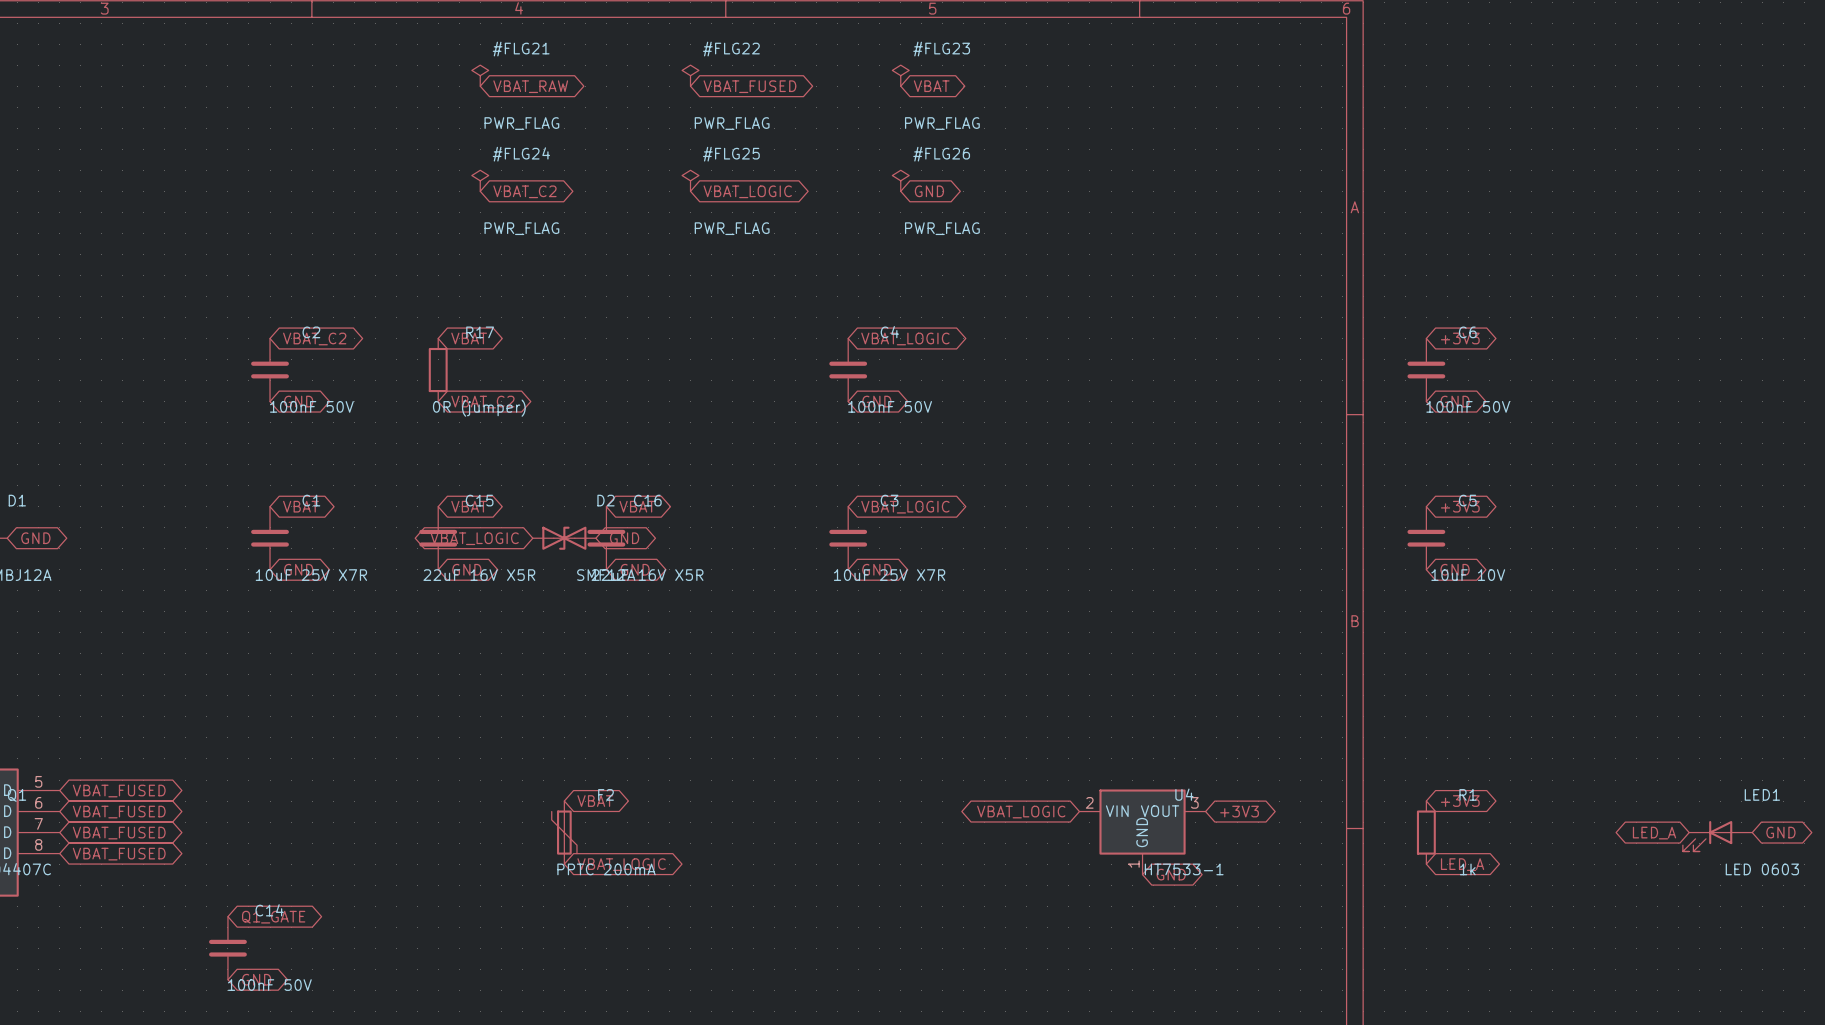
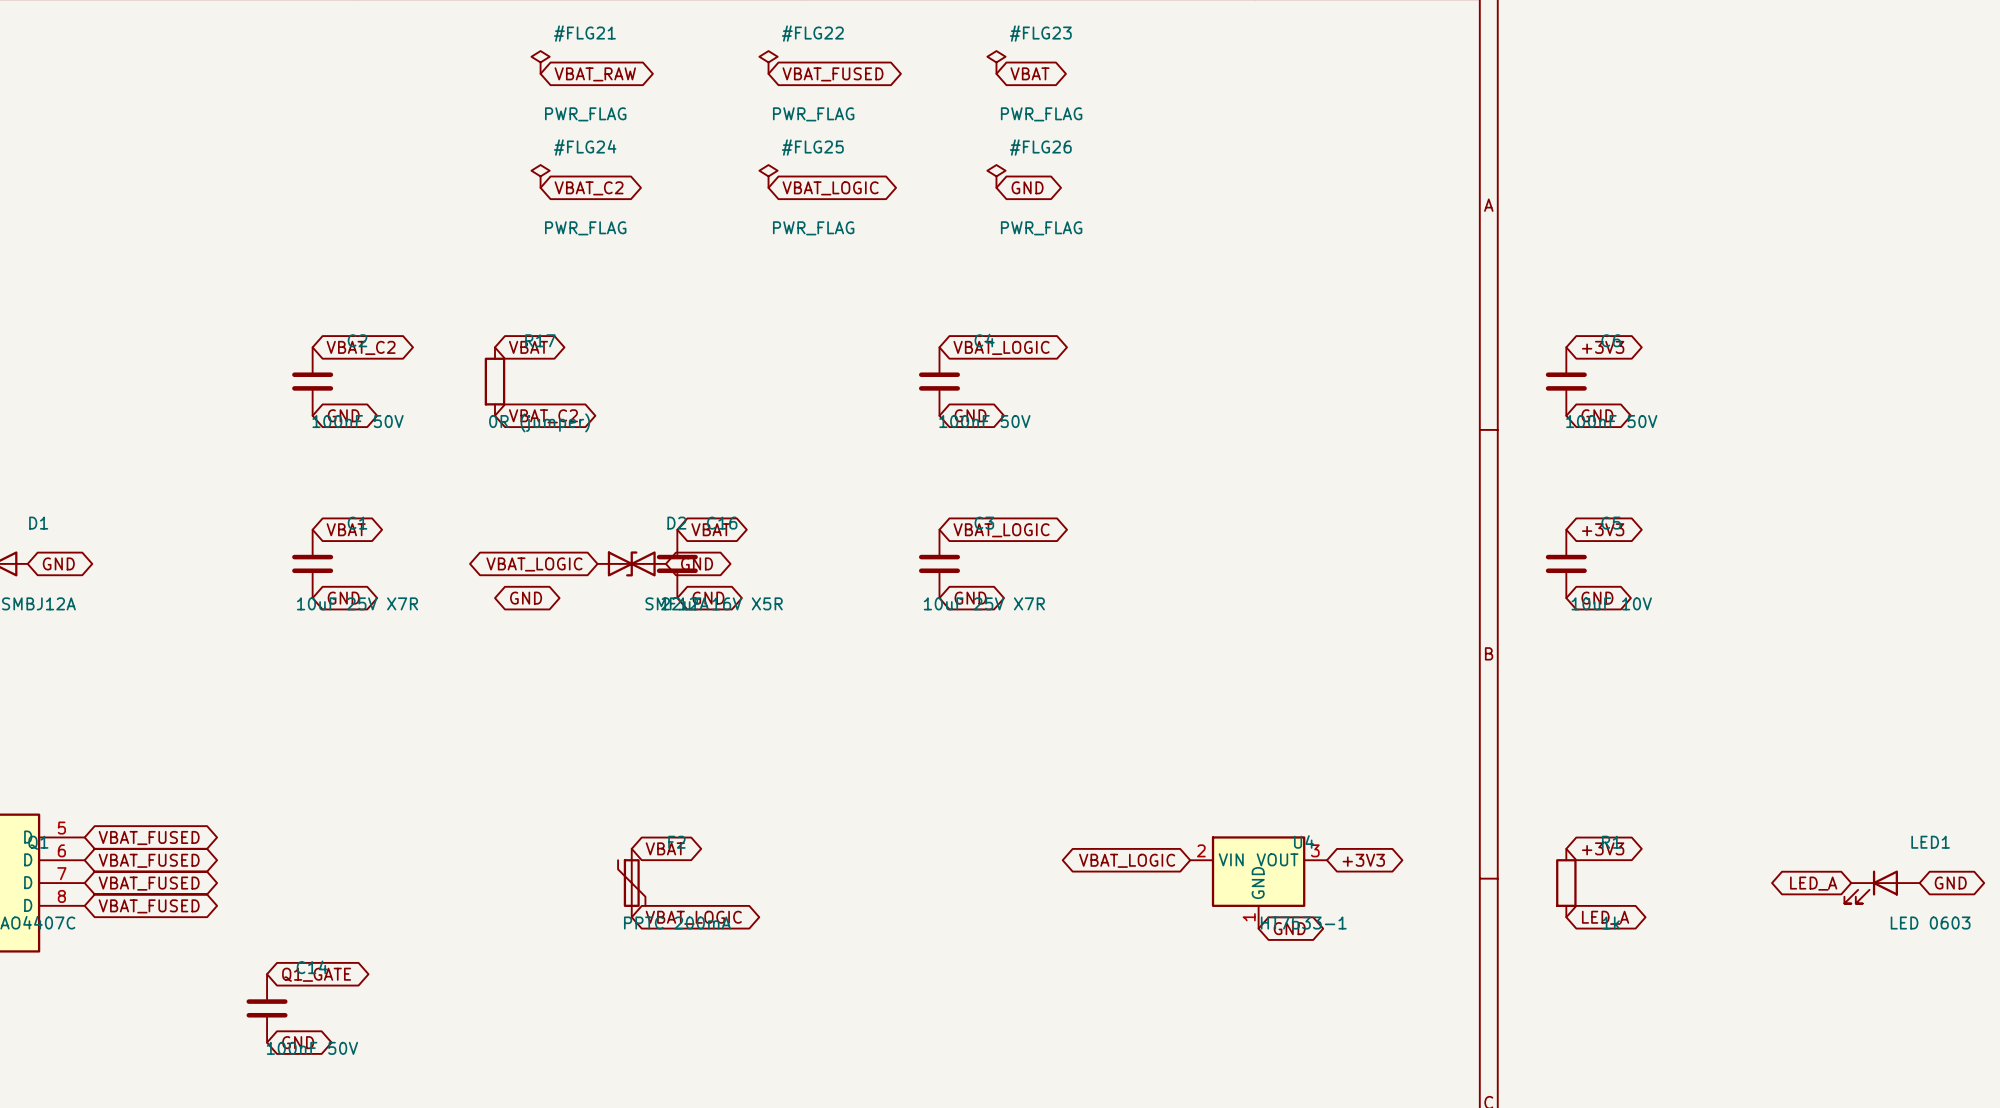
global label: VBAT (469, 506) -> none
C15: 22uF 16V X5R (438, 538) -> none

